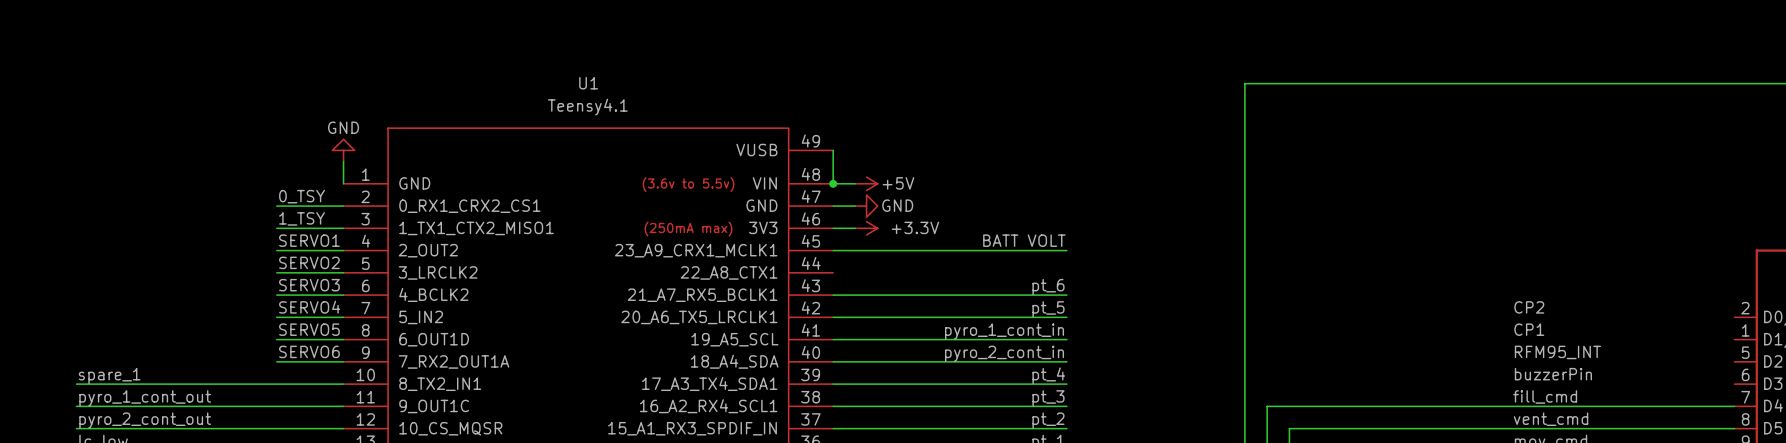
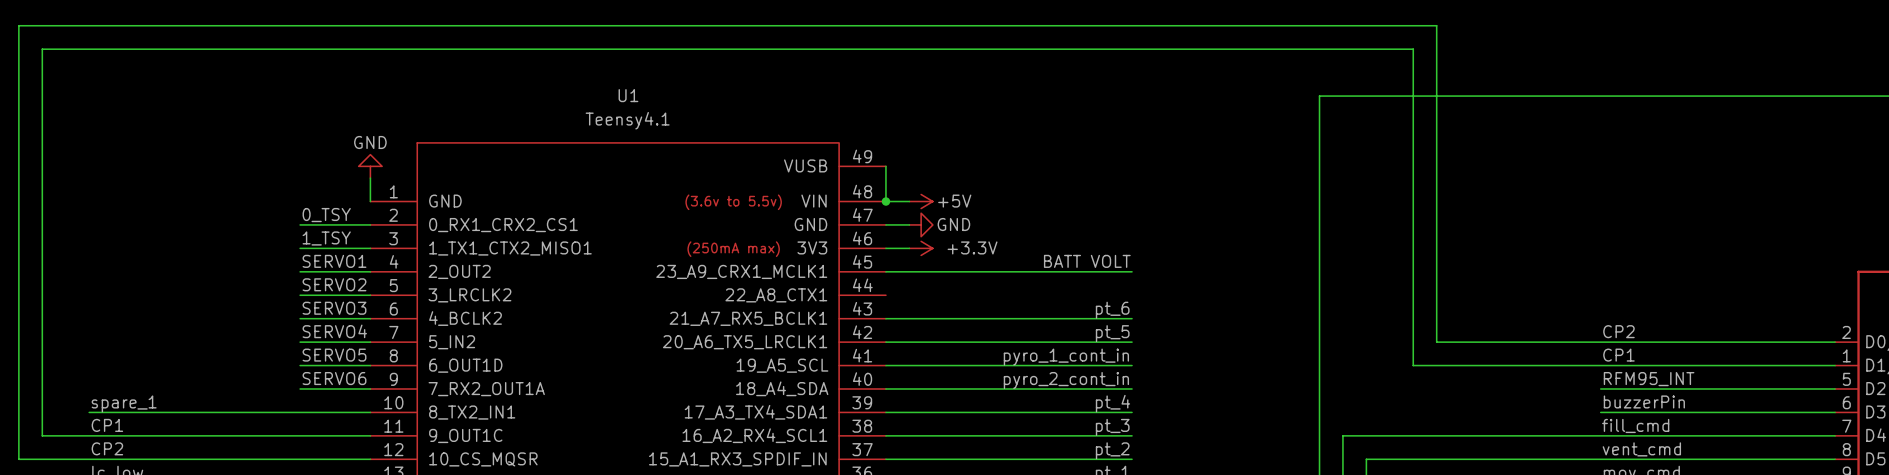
wire: none -> (1835, 342) (1436, 342) (1436, 25) (18, 25) (18, 459) (89, 459)
wire: none -> (1835, 365) (1413, 365) (1413, 49) (42, 49) (42, 435) (89, 435)
wire: none -> (1600, 389) (1835, 389)
wire: none -> (1600, 412) (1835, 412)
label: pyro_1_cont_out (145, 398) -> CP1 (107, 425)
label: pyro_2_cont_out (145, 420) -> CP2 (107, 448)

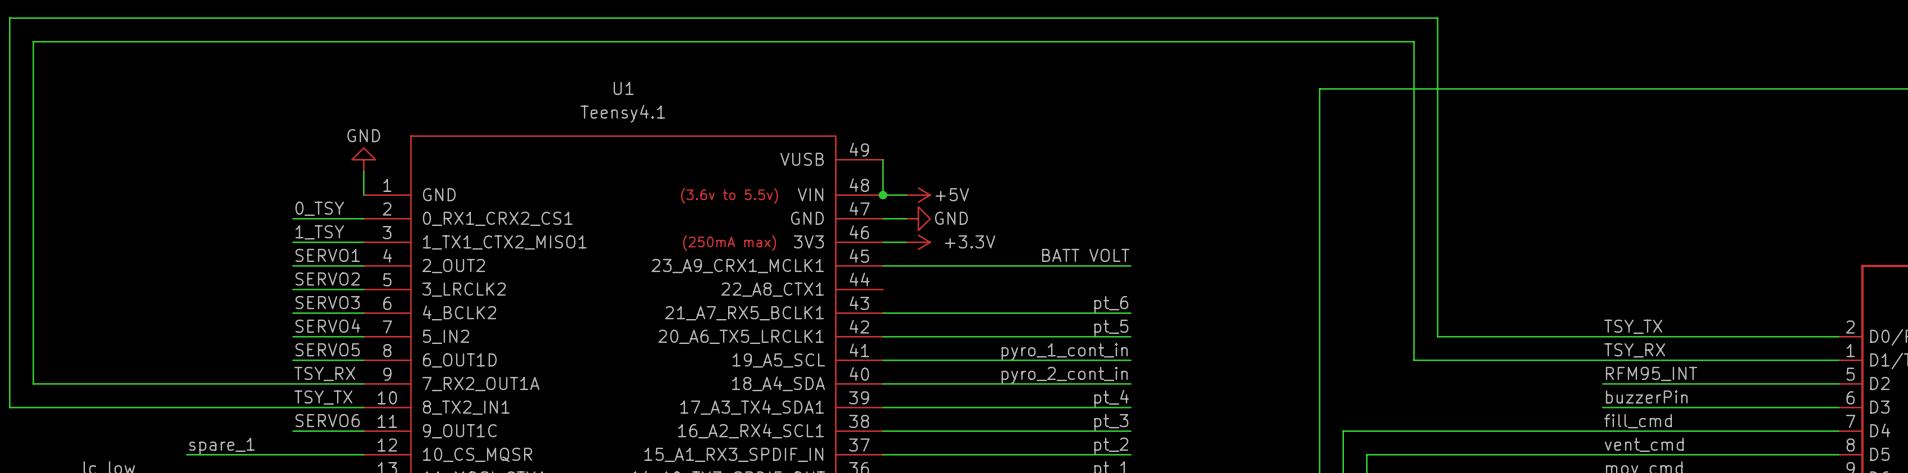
label: CP2 (1618, 331) -> TSY_TX (1633, 326)
label: CP1 (1618, 355) -> TSY_RX (1634, 350)
label: SERVO6 (334, 378) -> TSY_RX (324, 373)
wire: (42, 389) (42, 435) (300, 435) -> (33, 383) (292, 383)
label: none -> TSY_TX (323, 397)
label position: spare_1 (124, 403) -> spare_1 (221, 446)
wire: (18, 412) (18, 459) (194, 459) -> (9, 407) (80, 407)
label: CP1 (107, 425) -> none
label: none -> SERVO6 (327, 420)
label: CP2 (107, 448) -> none

